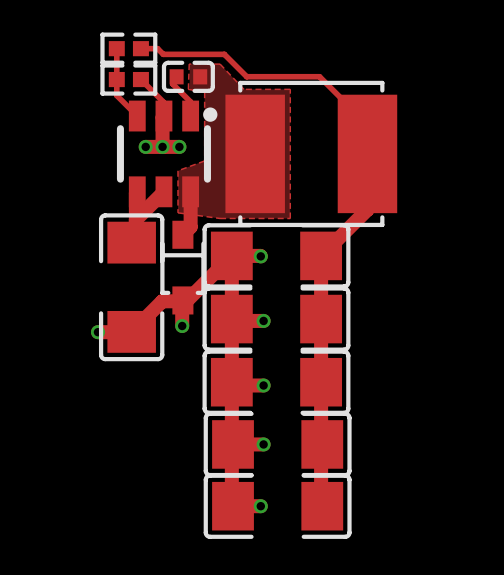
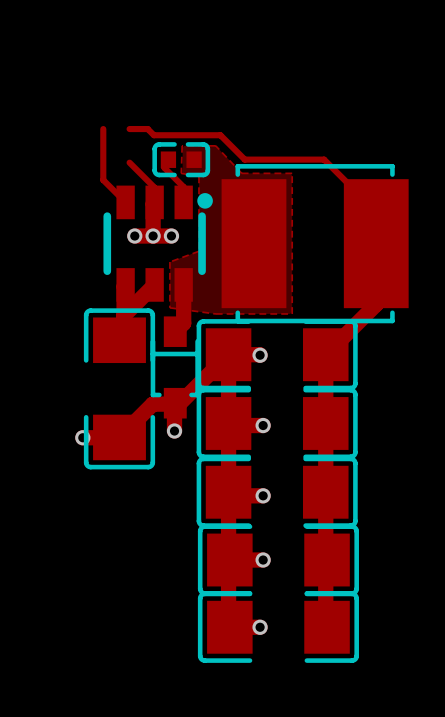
part: (128, 48) -> none
part: (128, 79) -> none

